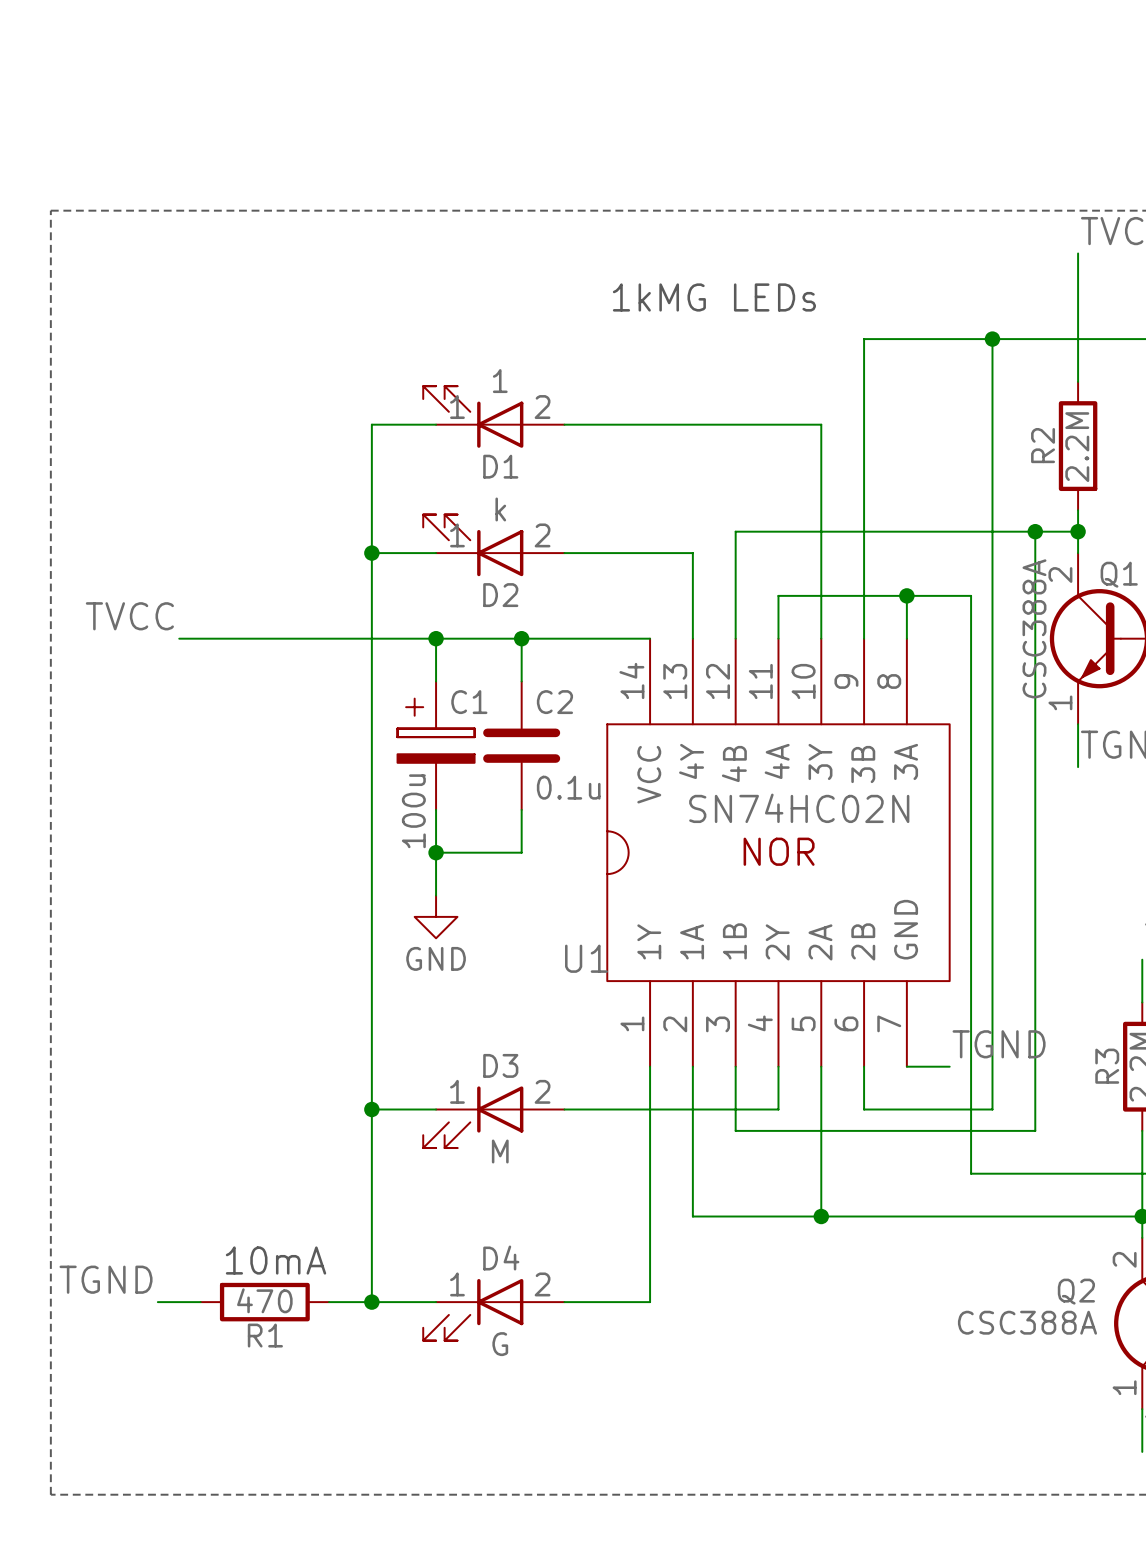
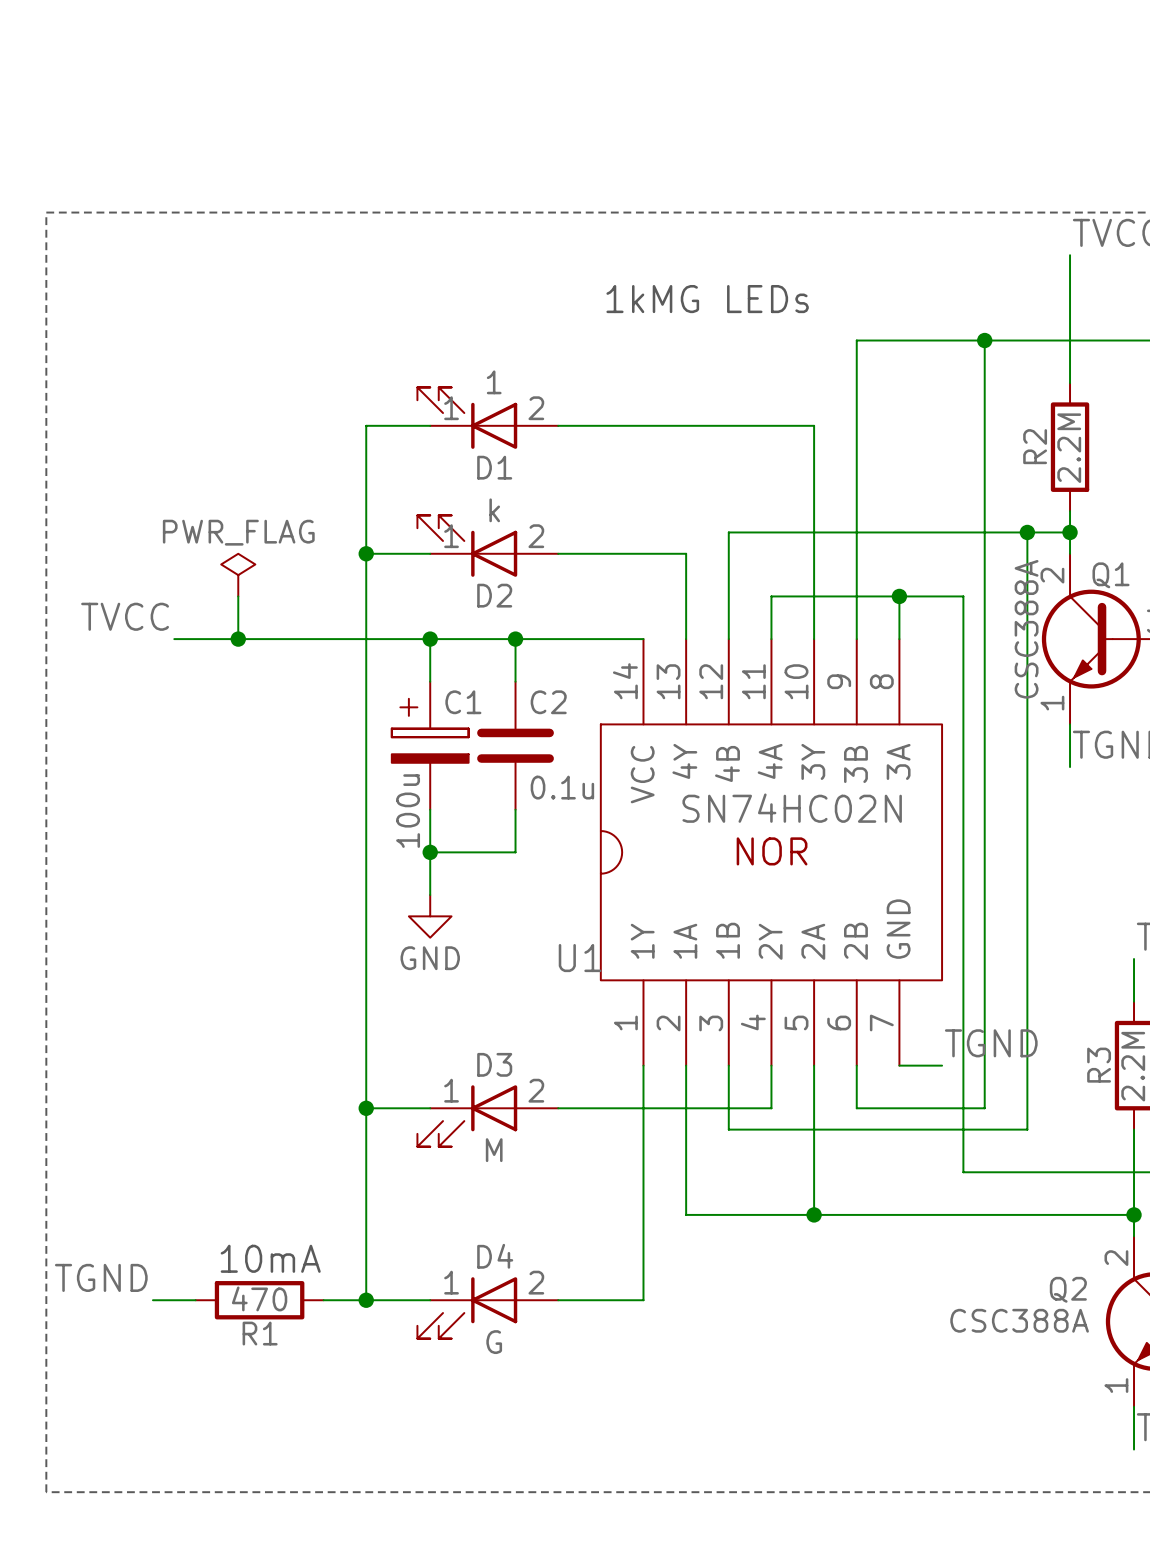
power symbol: none -> PWR_FLAG (238, 575)
wire: none -> (238, 596) (238, 639)
junction: none -> (238, 639)

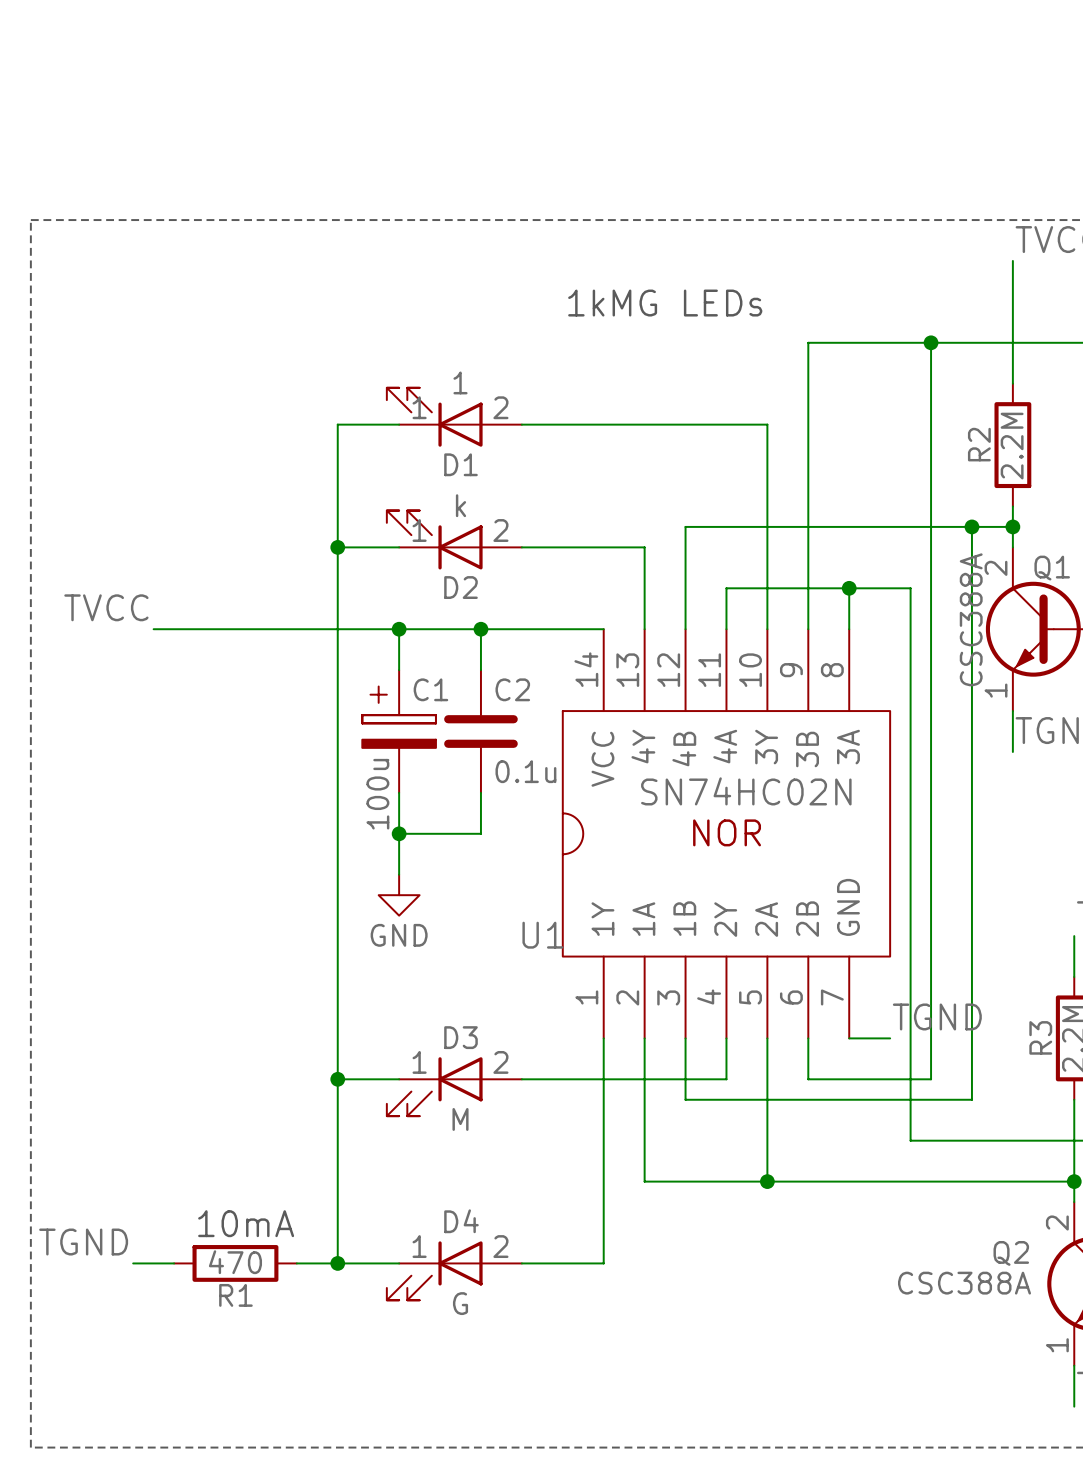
power symbol: PWR_FLAG (238, 575) -> none
wire: (238, 596) (238, 639) -> none
junction: (238, 639) -> none

